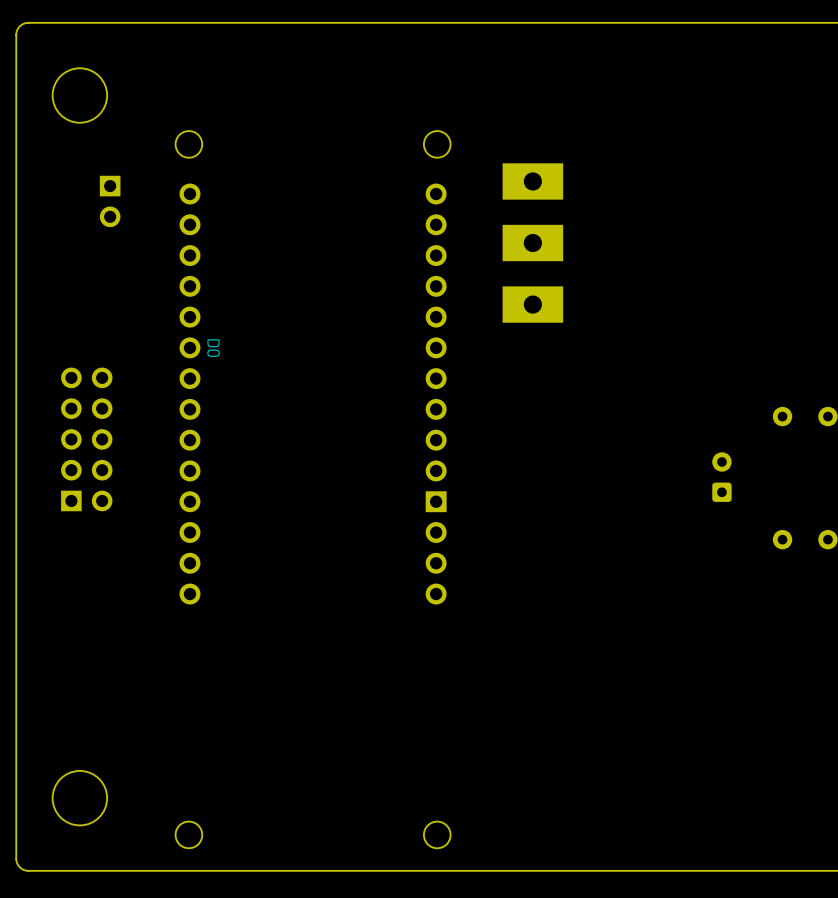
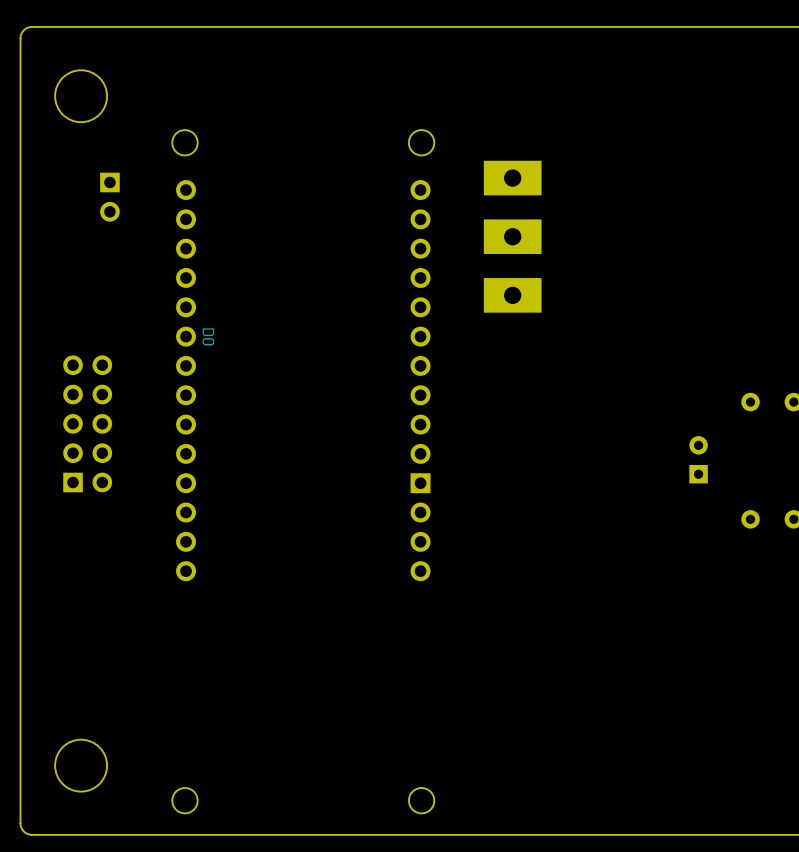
part footprint: [712, 452, 732, 502] -> [689, 436, 708, 484]

